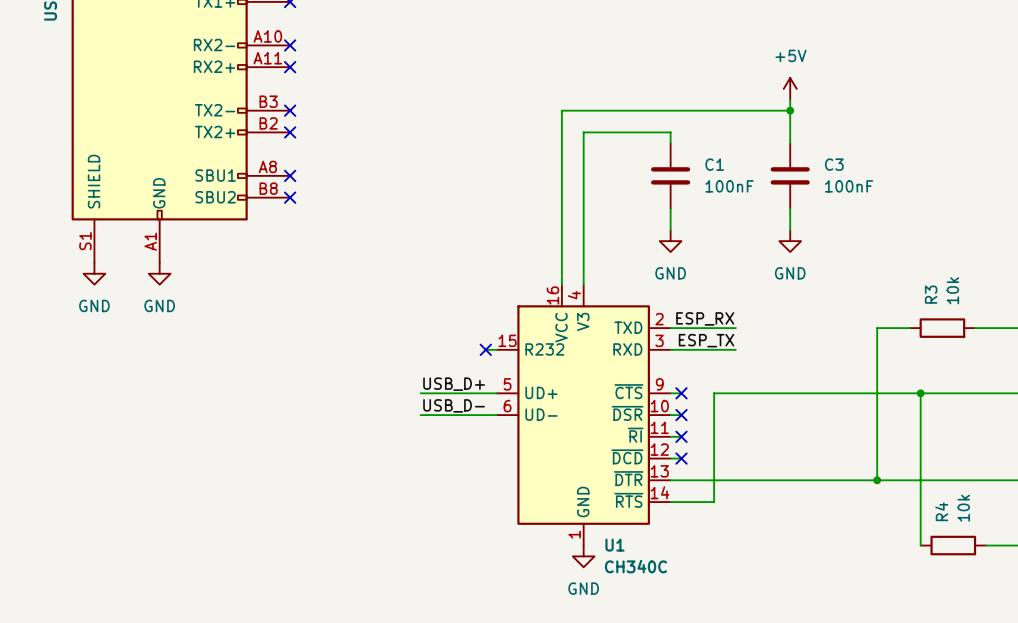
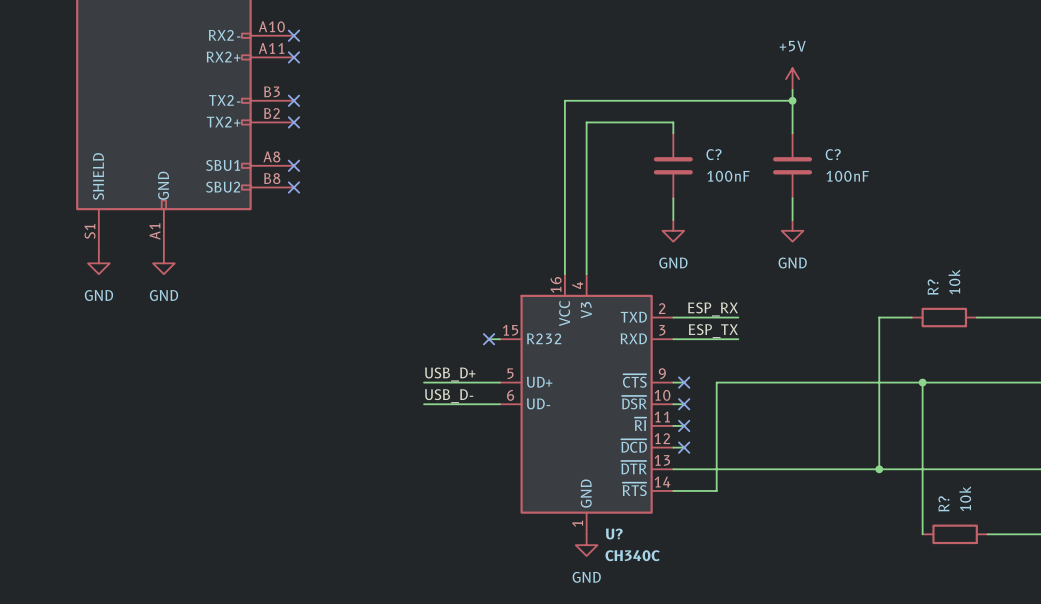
C1 name: C1 (714, 164) -> C? (714, 154)
C3 name: C3 (834, 164) -> C? (833, 154)
R3 name: R3 (931, 294) -> R? (933, 287)
R4 name: R4 (941, 511) -> R? (943, 503)
U1 name: U1 (615, 545) -> U? (614, 533)

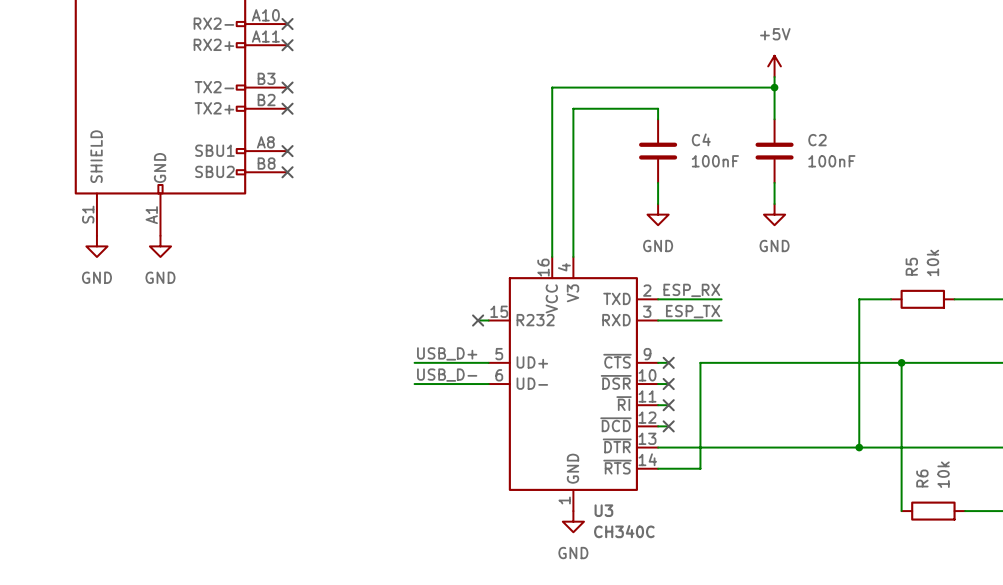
C? name: C? (714, 154) -> C4 (701, 139)
C? name: C? (833, 154) -> C2 (817, 140)
R? name: R? (933, 287) -> R5 (911, 266)
R? name: R? (943, 503) -> R6 (922, 478)
U? name: U? (614, 533) -> U3 (603, 510)

